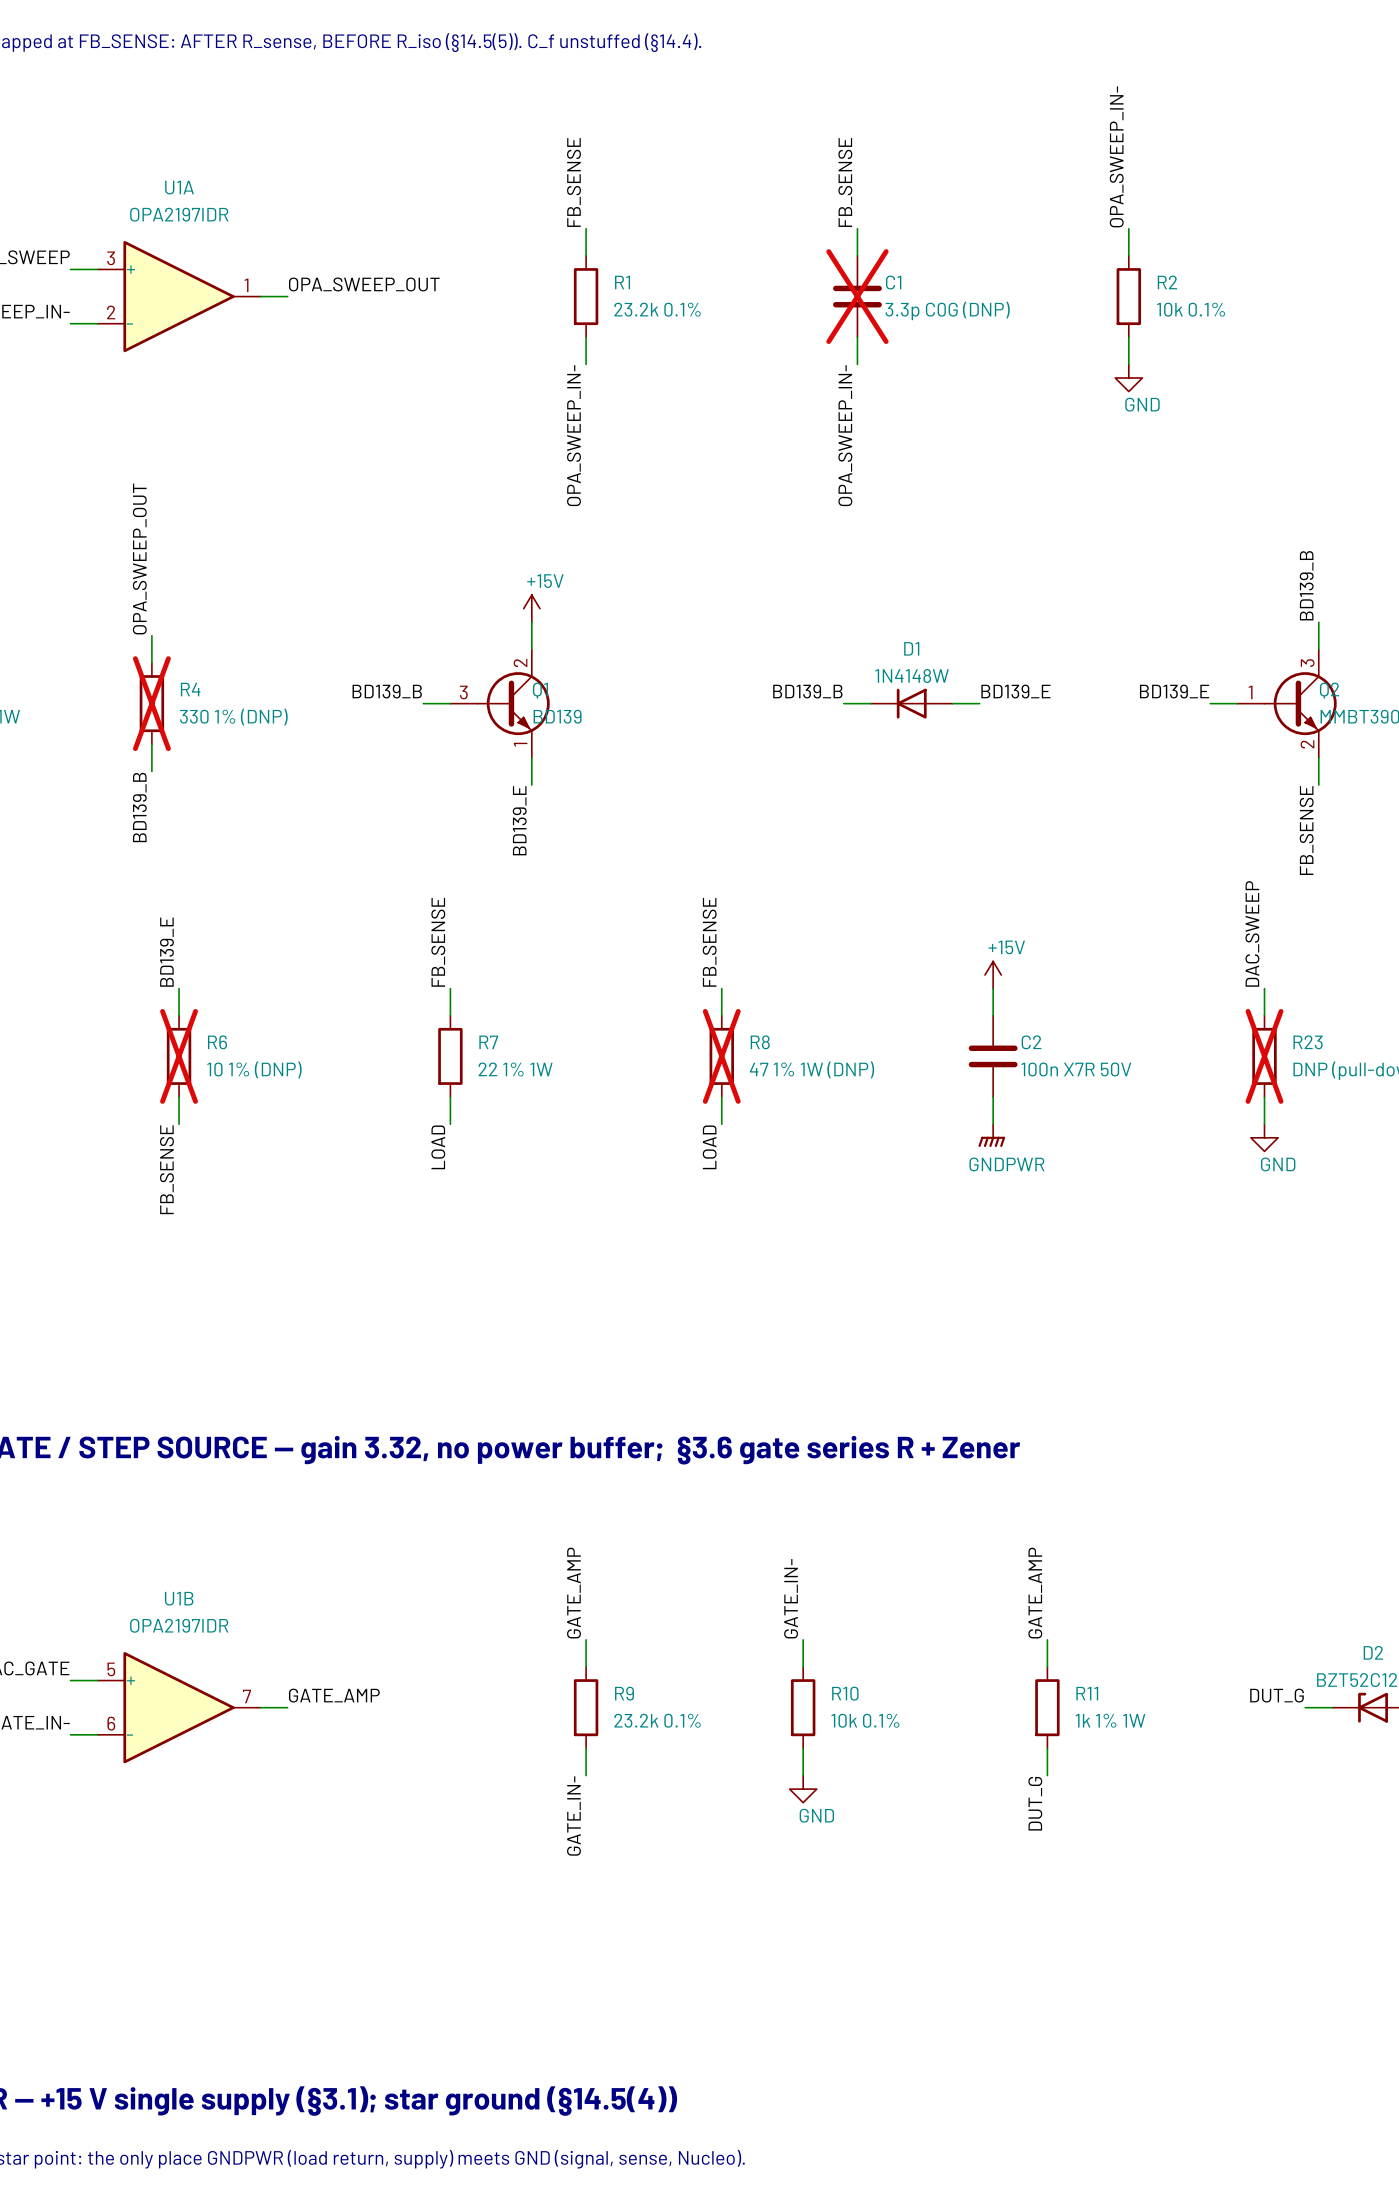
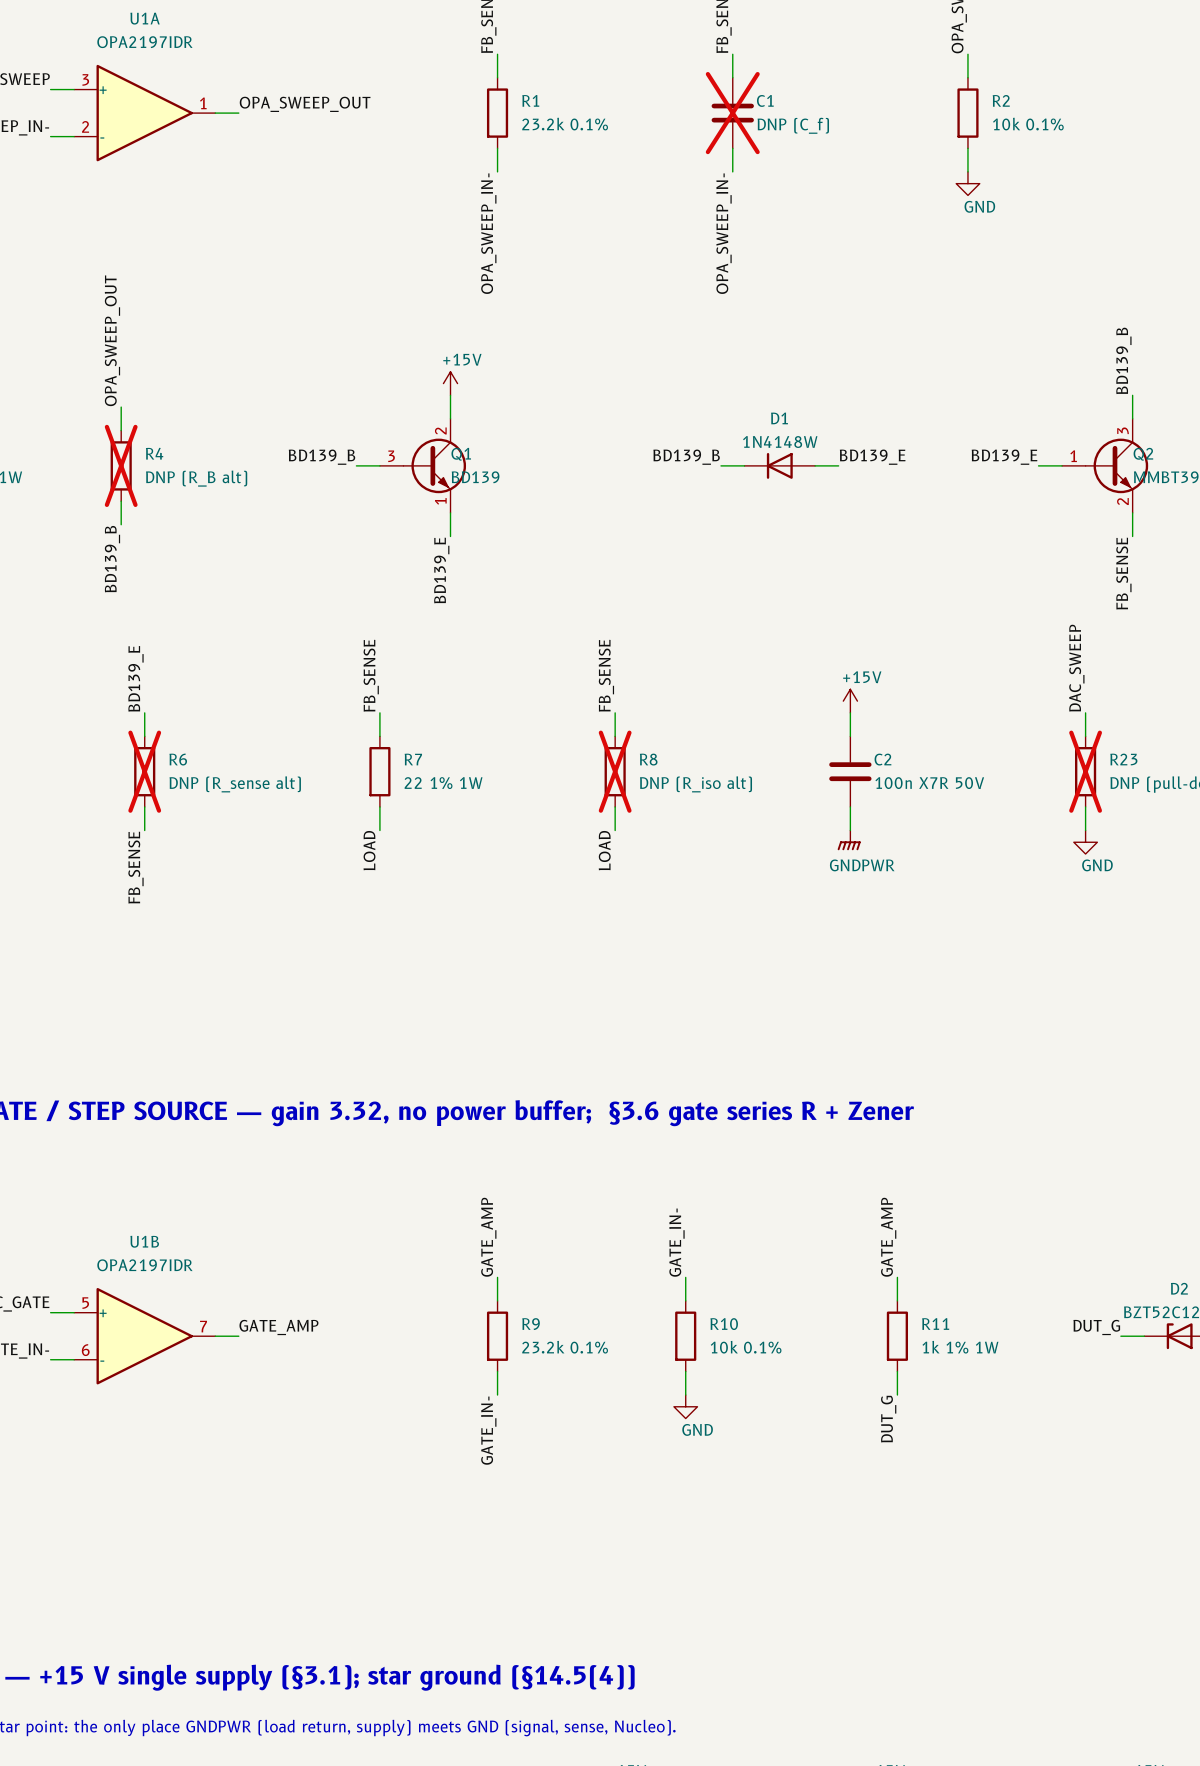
C1 value: 3.3p C0G (DNP) (947, 310) -> DNP (C_f) (793, 125)
R4 value: 330 1% (DNP) (233, 717) -> DNP (R_B alt) (196, 478)
R6 value: 10 1% (DNP) (254, 1069) -> DNP (R_sense alt) (235, 784)
R8 value: 47 1% 1W (DNP) (812, 1069) -> DNP (R_iso alt) (696, 784)

